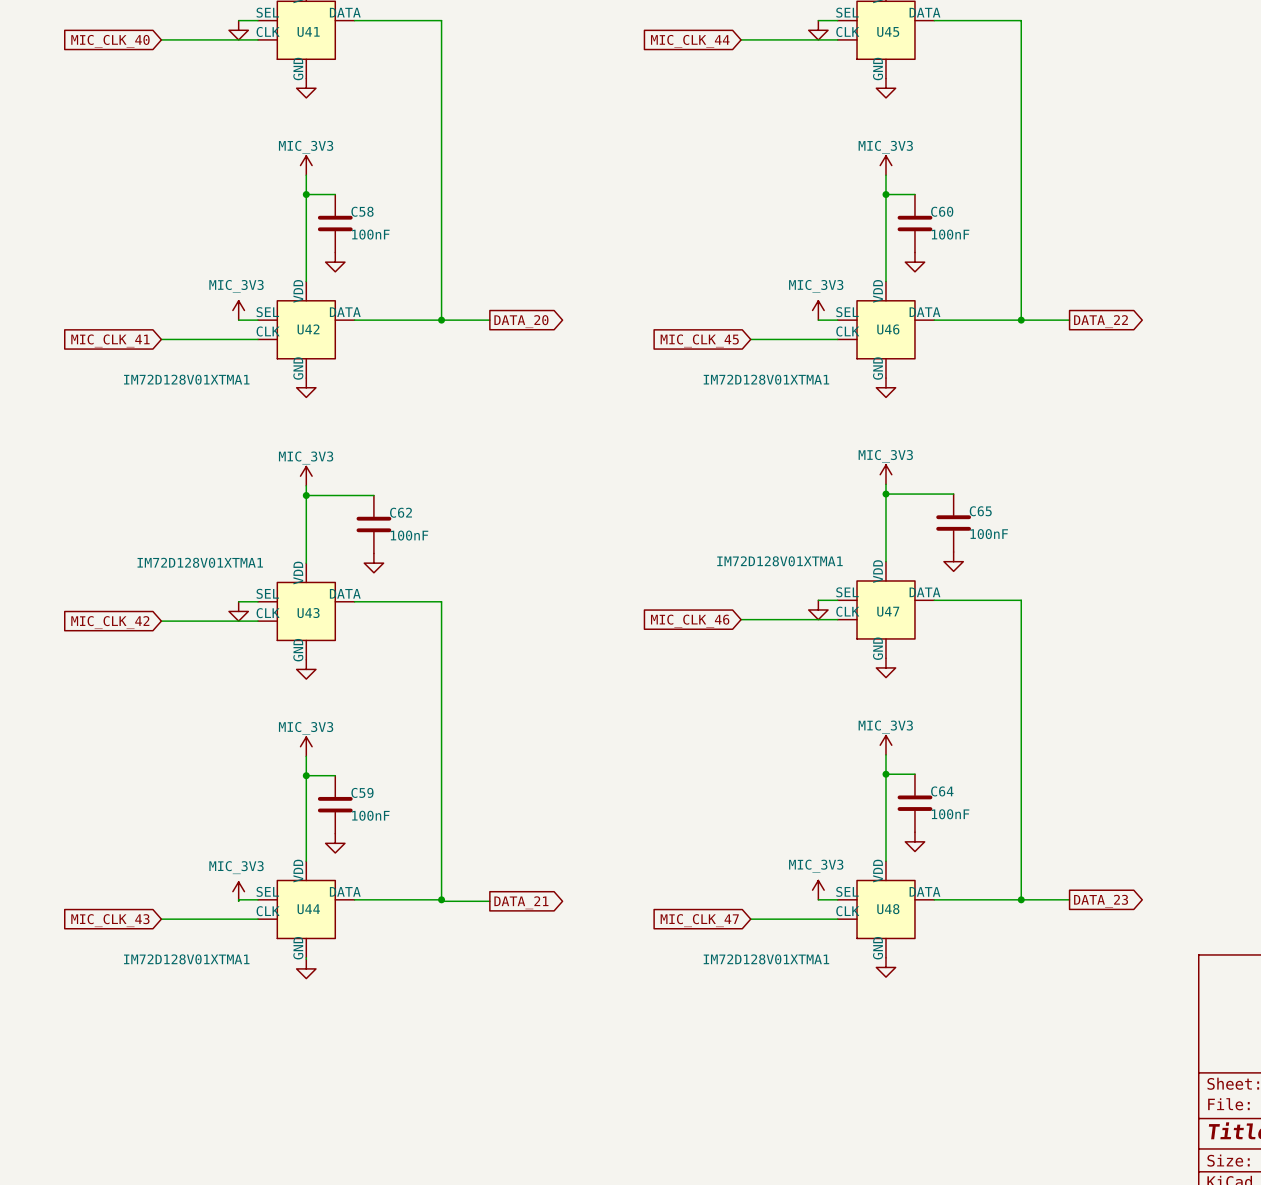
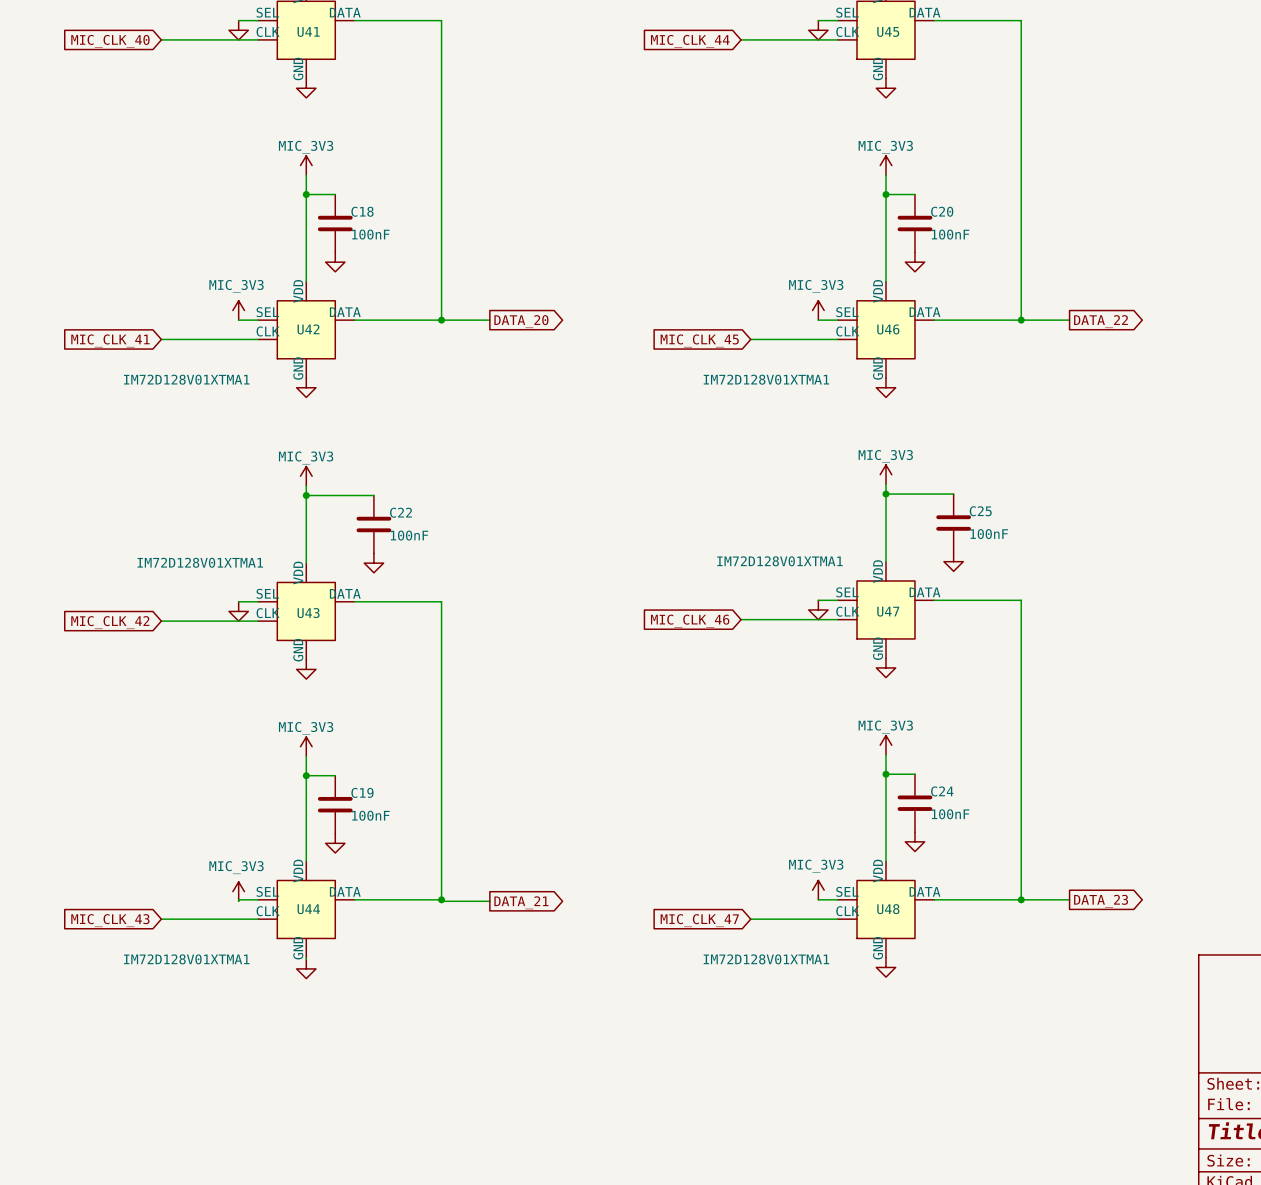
C58 name: C58 (362, 211) -> C18 (362, 211)
C60 name: C60 (942, 211) -> C20 (942, 211)
C65 name: C65 (980, 511) -> C25 (980, 511)
C62 name: C62 (401, 512) -> C22 (401, 512)
C64 name: C64 (942, 791) -> C24 (942, 791)
C59 name: C59 (362, 792) -> C19 (362, 792)

